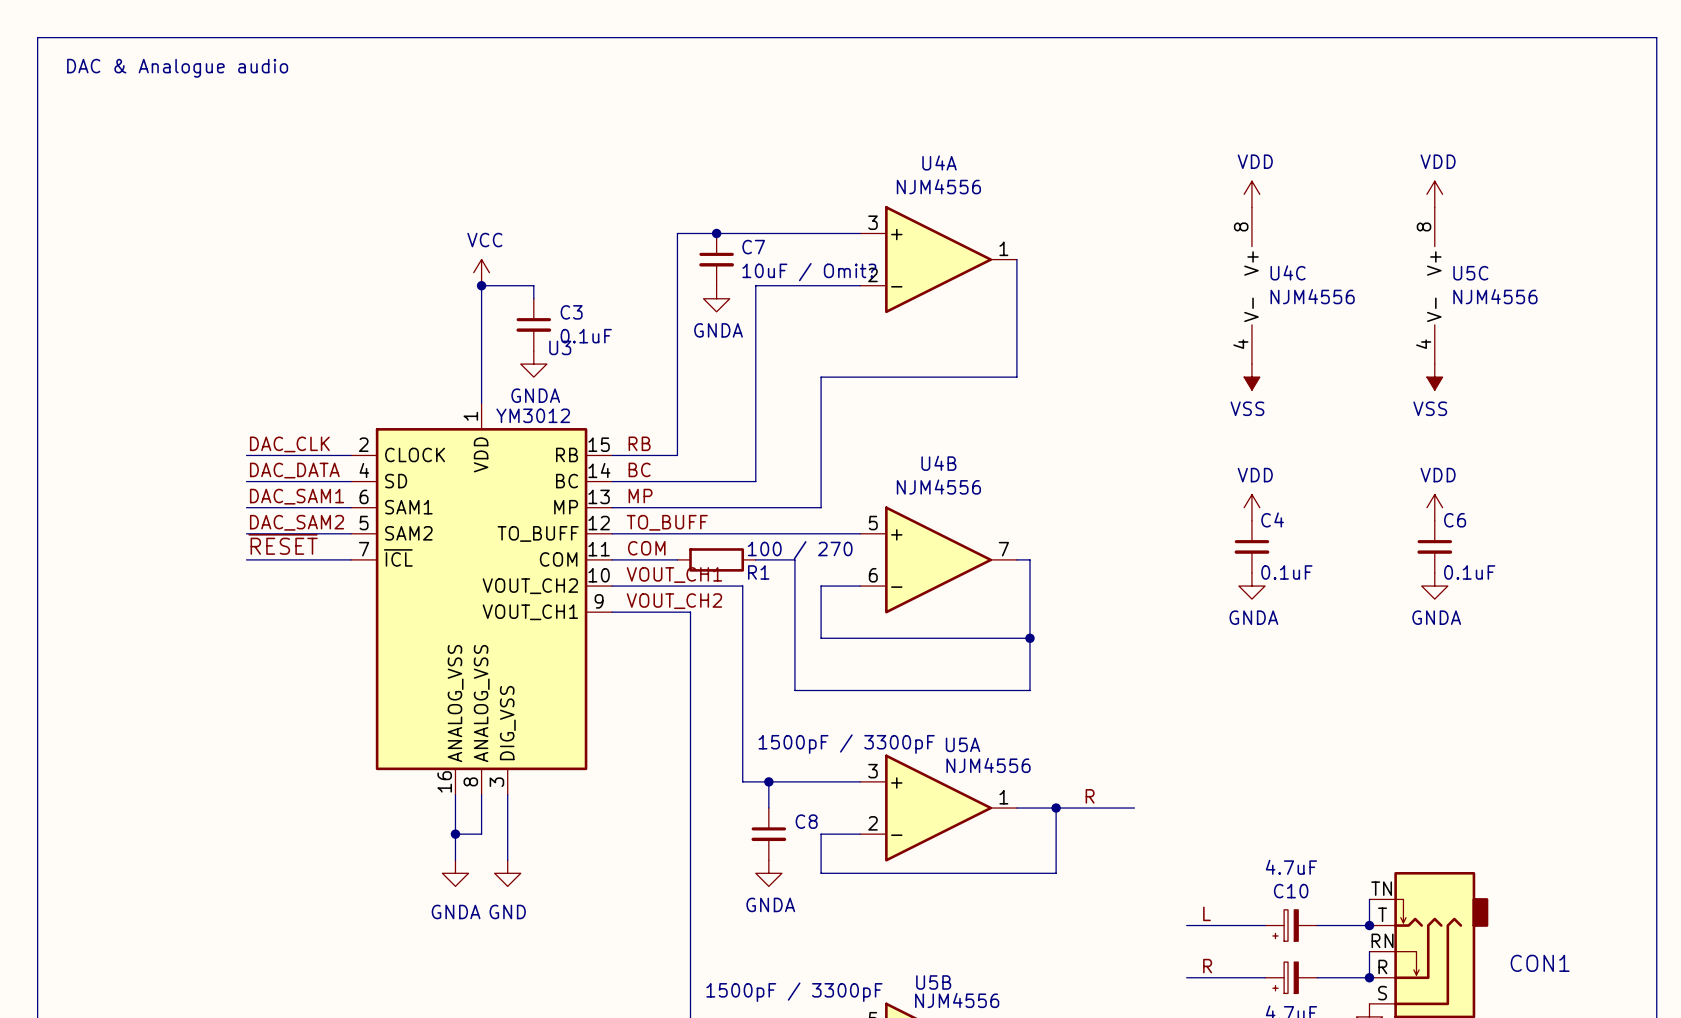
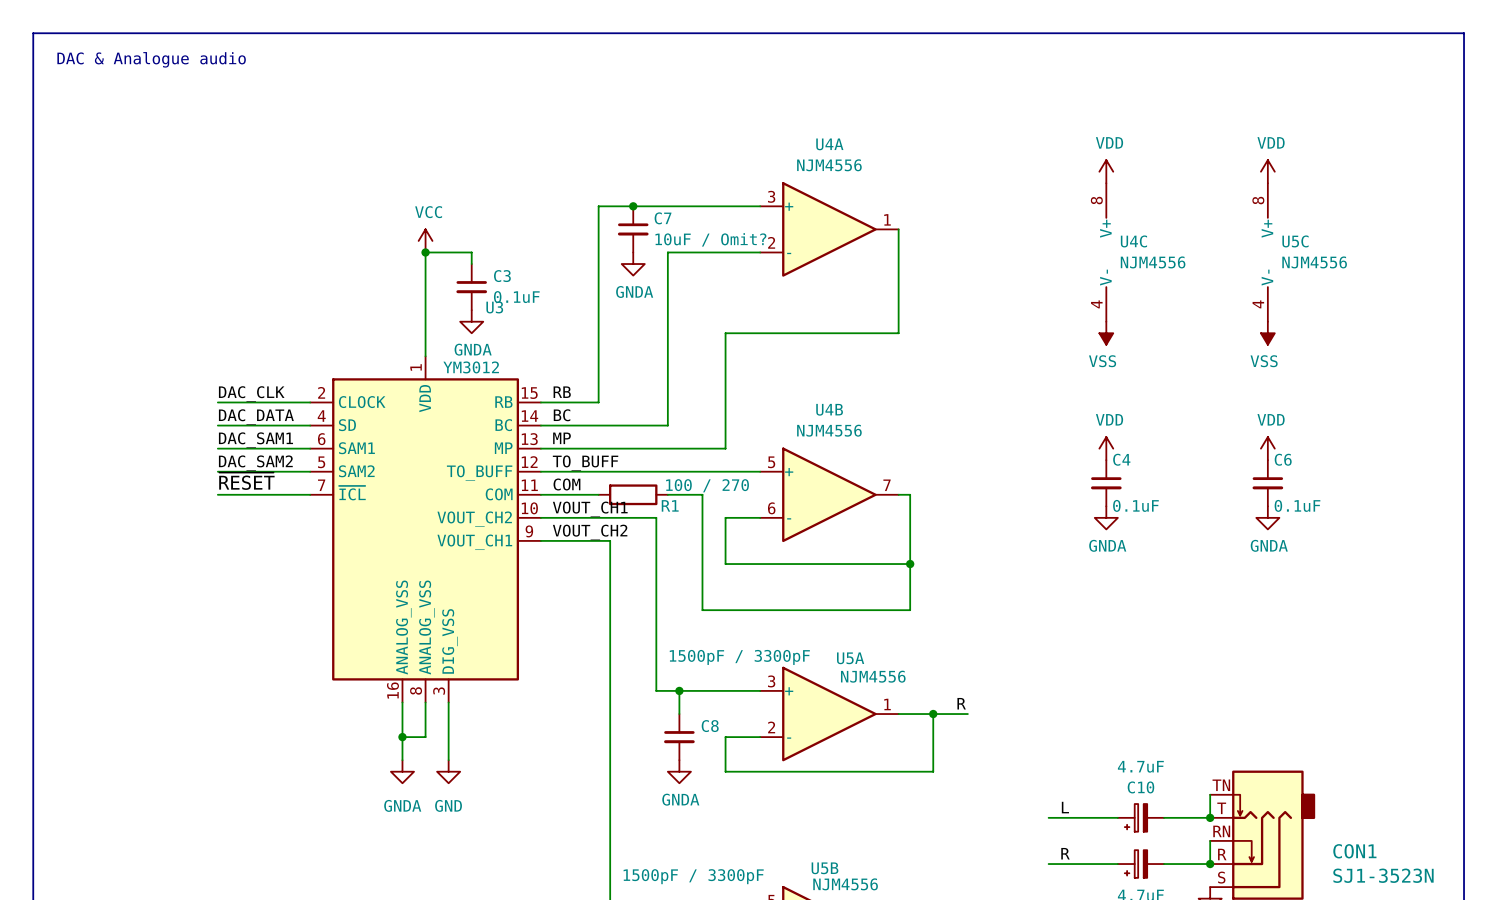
wire: (1095, 808) (1134, 808) -> none
CON1 value: none -> SJ1-3523N (1383, 875)

